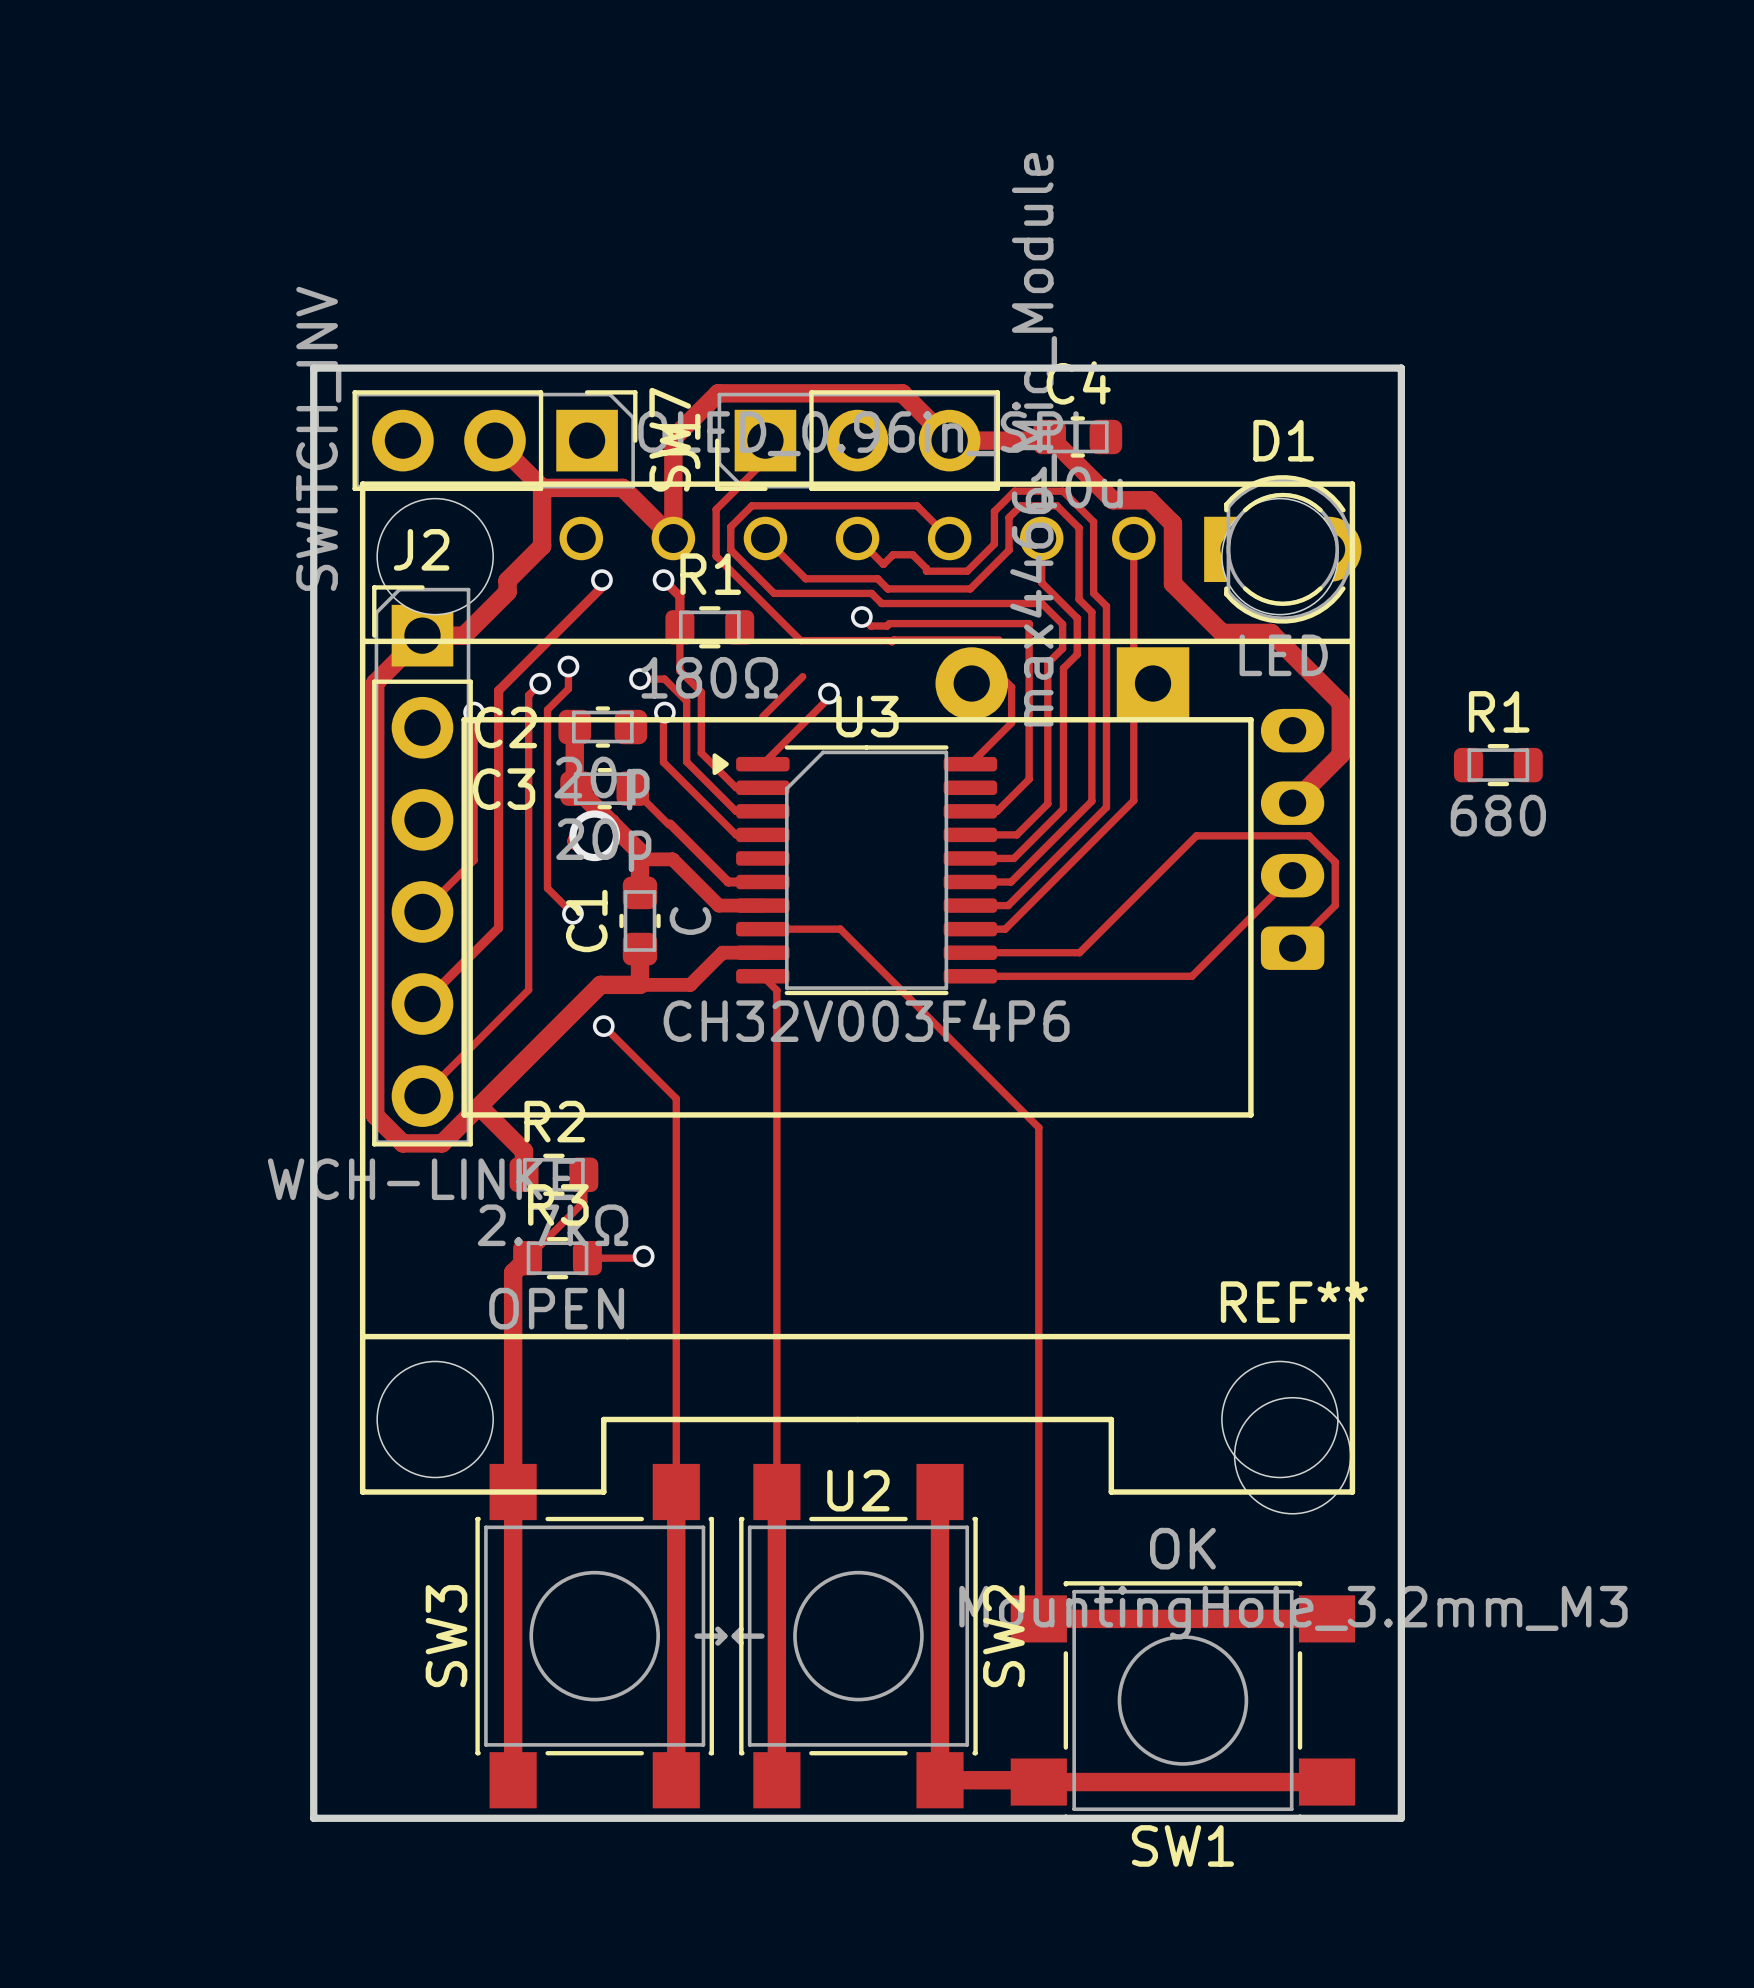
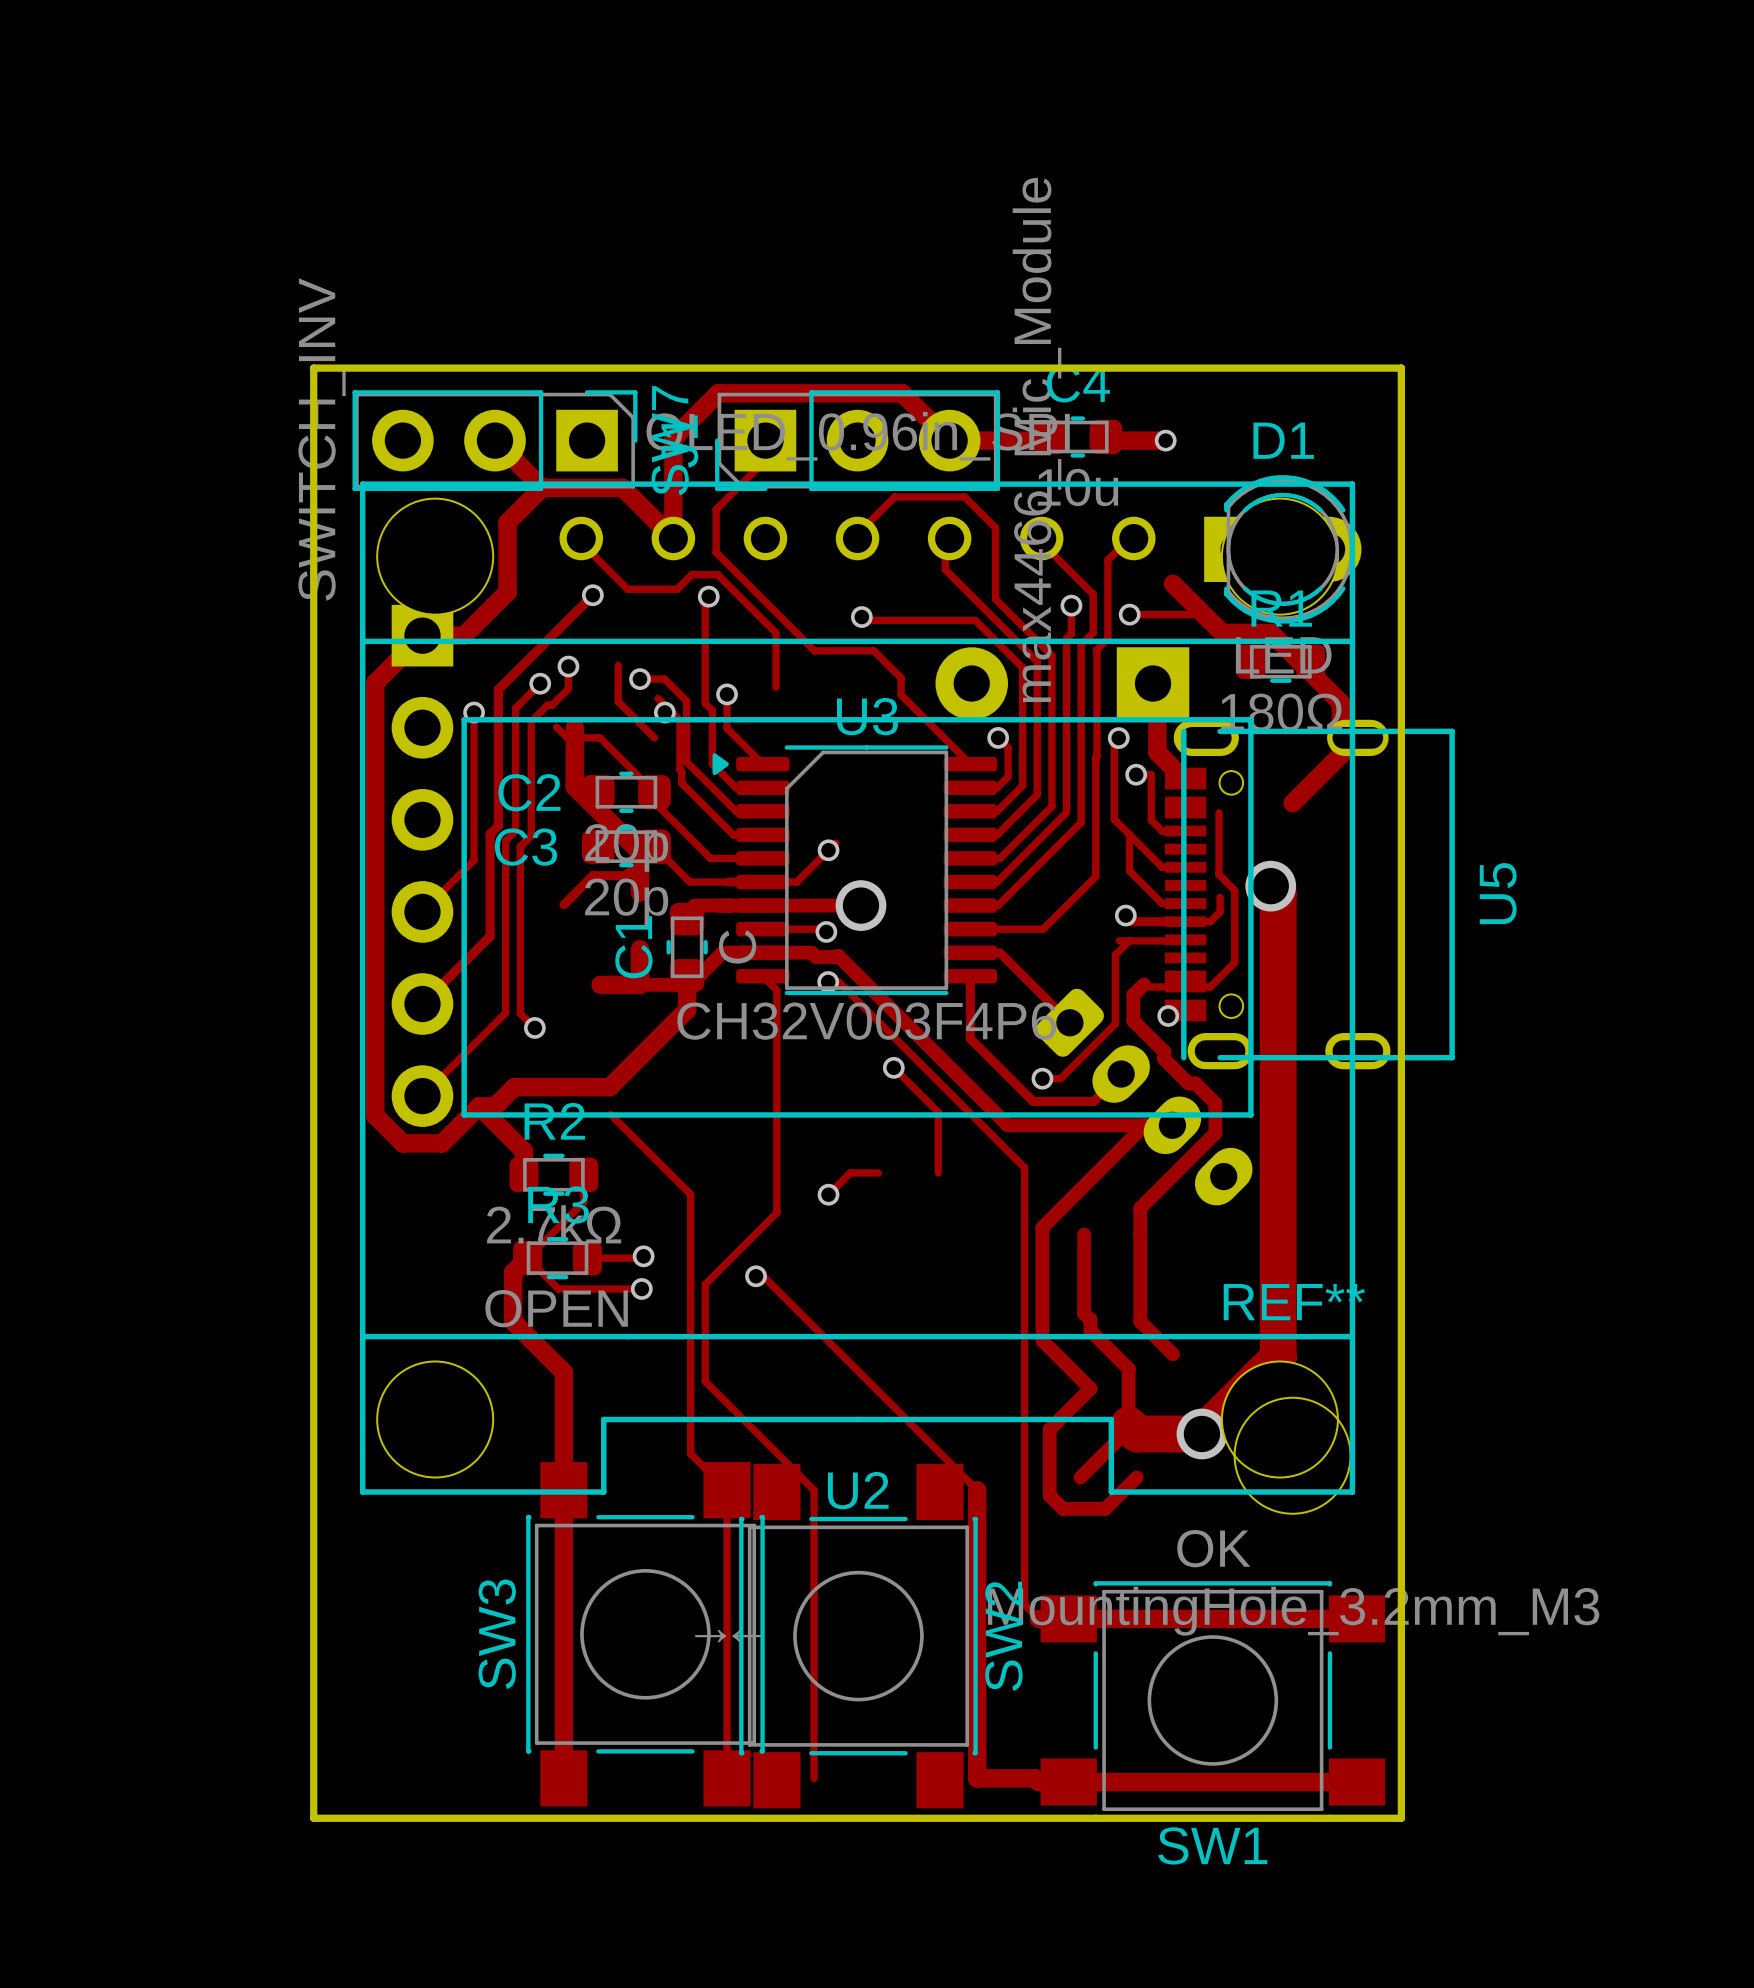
track: none -> (1105, 436) (1109, 440) (1165, 440)
track: (1053, 440) (1112, 500) (1149, 500) (1172, 523) (1172, 583) -> none
via: none -> (1165, 440)
track: (542, 487) (542, 546) (507, 580) -> (542, 487) (507, 522) (507, 580)
track: none -> (576, 538) (627, 589) (677, 589) (691, 574) (717, 574) (775, 633) (775, 687)
track: (765, 538) (805, 578) (877, 578) (887, 588) (970, 588) (1009, 550) (1009, 517) (1020, 505) (1056, 505) (1079, 527) (1079, 599) (1091, 612) (1091, 801) (1011, 882) (997, 882) -> (1071, 605) (1071, 633) (1066, 638) (1066, 812) (997, 882)
track: (857, 538) (883, 564) (893, 554) (912, 554) (926, 568) (926, 571) (967, 571) (994, 544) (994, 511) (1014, 491) (1062, 491) (1093, 521) (1093, 593) (1106, 606) (1106, 807) (1008, 905) (998, 905) -> (1037, 538) (1093, 594) (1093, 632) (1081, 644) (1081, 822) (998, 905)
track: (949, 538) (916, 505) (751, 505) (730, 526) (730, 550) (774, 593) (871, 593) (881, 603) (1041, 603) (1062, 624) (1062, 648) (1047, 663) (1047, 803) (1016, 834) (997, 834) -> (945, 538) (945, 569) (1037, 661) (1037, 794) (997, 834)
track: (1041, 538) (1041, 582) (1077, 618) (1077, 654) (1063, 668) (1063, 808) (1013, 858) (1000, 858) -> (853, 538) (894, 496) (964, 496) (995, 527) (995, 599) (1051, 655) (1051, 806) (1000, 858)
track: (1133, 538) (1133, 800) (1005, 929) -> (1129, 538) (1107, 560) (1107, 638) (1096, 649) (1095, 876) (1043, 929) (1005, 929)
track: (716, 552) (716, 556) (800, 640) (998, 639) -> (716, 552) (814, 650) (873, 650) (901, 678) (901, 694) (970, 764)
track: (601, 580) (601, 587) (498, 690) (498, 927) (490, 936) -> (592, 595) (498, 689) (498, 826) (490, 834) (490, 936)
via position: (601, 580) -> (592, 595)
track: (663, 580) (679, 596) (679, 670) (701, 692) (701, 752) (712, 764) -> (708, 596) (705, 600) (705, 703) (712, 710) (712, 764)
via: (663, 580) -> none
via: none -> (708, 596)
via: none -> (1071, 605)
track: none -> (1129, 614) (1203, 614)
via: none -> (1129, 614)
track: (861, 617) (870, 626) (887, 626) (889, 623) (1029, 623) (1029, 779) (1022, 785) -> (863, 620) (975, 620) (1022, 667) (1022, 785)
R1 position: (709, 627) -> (1280, 661)
track: none -> (618, 665) (618, 701) (654, 737)
track: (998, 674) (1011, 687) (1011, 722) (970, 764) -> none
track: (802, 676) (762, 716) -> none
track: none -> (1153, 683) (1157, 687) (1157, 752) (1178, 773)
track: (829, 693) (829, 698) (762, 764) -> (727, 694) (727, 728) (762, 764)
via: (829, 693) -> none
via: none -> (727, 694)
track: (528, 695) (528, 989) (505, 1012) -> (528, 695) (515, 708) (515, 830) (505, 840) (505, 1012)
track: (552, 705) (547, 709) (547, 888) (572, 913) -> (552, 705) (547, 705) (531, 721) (531, 835) (520, 846) (520, 1013) (534, 1027)
track: (664, 712) (663, 762) (736, 834) -> (657, 698) (679, 720) (681, 783) (733, 834) (736, 834)
track: none -> (556, 727) (567, 737) (600, 737) (654, 792) (654, 802) (710, 858) (762, 858)
C2 position: (602, 727) -> (626, 792)
track: none -> (998, 737) (1008, 747) (1008, 776) (997, 787) (970, 787)
via: none -> (998, 737)
track: none -> (1118, 738) (1114, 742) (1114, 819) (1162, 867) (1185, 867)
via: none -> (1118, 738)
R1: 680 (1498, 765) -> none
via: none -> (1136, 774)
track: none -> (1133, 777) (1136, 774) (1151, 774) (1151, 820) (1162, 831) (1185, 831)
C3 position: (604, 788) -> (626, 846)
track: (632, 788) (669, 824) -> none
track: none -> (1219, 812) (1219, 874) (1234, 890) (1234, 962) (1210, 986) (1146, 986) (1143, 984) (1133, 995) (1133, 1020) (1164, 1051) (1164, 1058) (1188, 1083) (1195, 1083) (1215, 1103) (1215, 1133) (1140, 1208) (1140, 1321) (1172, 1354)
track: (670, 823) (728, 882) -> (563, 904) (592, 875) (625, 875) (654, 846) (689, 882) (728, 882)
track: none -> (1129, 834) (1129, 870) (1162, 903) (1185, 903)
via: (594, 835) -> none
part: (1292, 839) -> none
track: none -> (835, 843) (796, 882) (762, 882)
via: none -> (828, 850)
track: (640, 859) (672, 859) (718, 905) -> (694, 905) (718, 905)
J2 side: top (422, 865) -> bottom (422, 865)
track: (1292, 875) (1191, 976) (970, 976) -> (1121, 1074) (1093, 1101) (1033, 1101) (970, 1038) (970, 976)
track: none -> (1270, 886) (1278, 893) (1278, 1357) (1201, 1433) (1137, 1433) (1128, 1424)
via: none -> (1270, 886)
U5: none -> (1309, 894)
track: none -> (1220, 897) (1220, 911) (1210, 921) (1131, 921) (1125, 915)
track: none -> (762, 905) (860, 905)
via: none -> (860, 905)
via: (572, 913) -> none
via: none -> (1125, 915)
C1 position: (640, 920) -> (687, 947)
track: (823, 929) (840, 929) (1038, 1127) (1038, 1618) -> (828, 982) (838, 982) (1024, 1167) (1024, 1604) (1038, 1618)
via: none -> (826, 931)
track: none -> (1185, 939) (1119, 940)
track: none -> (1129, 940) (1115, 954) (1115, 1023) (1060, 1078) (1042, 1078)
track: (1292, 948) (1335, 905) (1335, 862) (1308, 835) (1196, 835) (1079, 952) (999, 952) -> (1069, 1022) (999, 952)
track: none -> (762, 952) (811, 952) (816, 956) (837, 955)
track: none -> (838, 955) (1007, 1125) (1172, 1125)
via: none -> (828, 982)
track: (600, 984) (479, 1106) -> (690, 984) (687, 988) (687, 1009) (609, 1087) (514, 1087) (495, 1106) (479, 1106)
via: none -> (1168, 1015)
track: (603, 1026) (676, 1098) (676, 1780) -> none
via: (603, 1026) -> none
via: none -> (534, 1027)
track: none -> (893, 1067) (938, 1112) (938, 1172)
via: none -> (893, 1067)
via: none -> (1042, 1078)
part: none -> (1144, 1097)
track: none -> (610, 1114) (690, 1194) (690, 1453) (727, 1490) (727, 1778)
track: none -> (1144, 1125) (1042, 1227) (1042, 1340) (1090, 1388) (1049, 1429) (1049, 1495) (1062, 1508) (1105, 1508) (1136, 1477)
track: none -> (878, 1172) (850, 1172) (828, 1194)
via: none -> (828, 1194)
track: (776, 1212) (776, 1780) -> (776, 1212) (705, 1284) (705, 1381) (814, 1490) (814, 1778)
track: none -> (1084, 1234) (1084, 1313) (1090, 1319) (1090, 1330) (1128, 1368) (1128, 1429) (1080, 1477)
track: none -> (527, 1258) (558, 1288) (641, 1288)
via: none -> (756, 1276)
via: none -> (641, 1288)
track: (513, 1321) (513, 1780) -> (513, 1321) (563, 1372) (563, 1778)
via: none -> (1201, 1433)
track: (940, 1492) (940, 1780) (1037, 1780) -> (756, 1276) (763, 1276) (977, 1490) (977, 1778) (1035, 1778) (1037, 1780)
SW3 position: (594, 1636) -> (645, 1634)
SW1 position: (1182, 1700) -> (1212, 1700)

